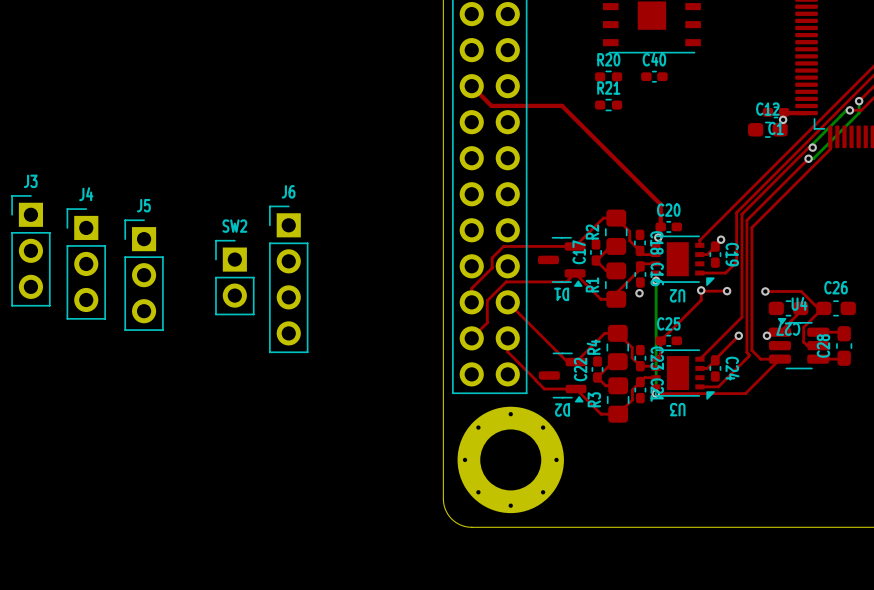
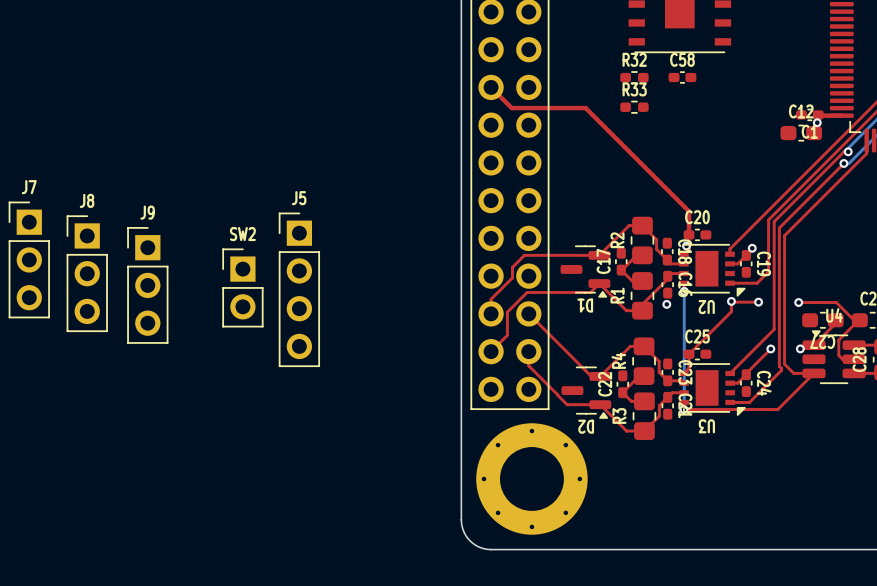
R20 name: R20 (608, 59) -> R32 (634, 59)
C40 name: C40 (654, 59) -> C58 (682, 59)
R21 name: R21 (608, 88) -> R33 (634, 89)
J3 name: J3 (30, 181) -> J7 (29, 187)
J6 name: J6 (288, 191) -> J5 (299, 198)
J4 name: J4 (86, 194) -> J8 (87, 200)
J5 name: J5 (143, 205) -> J9 (147, 212)

